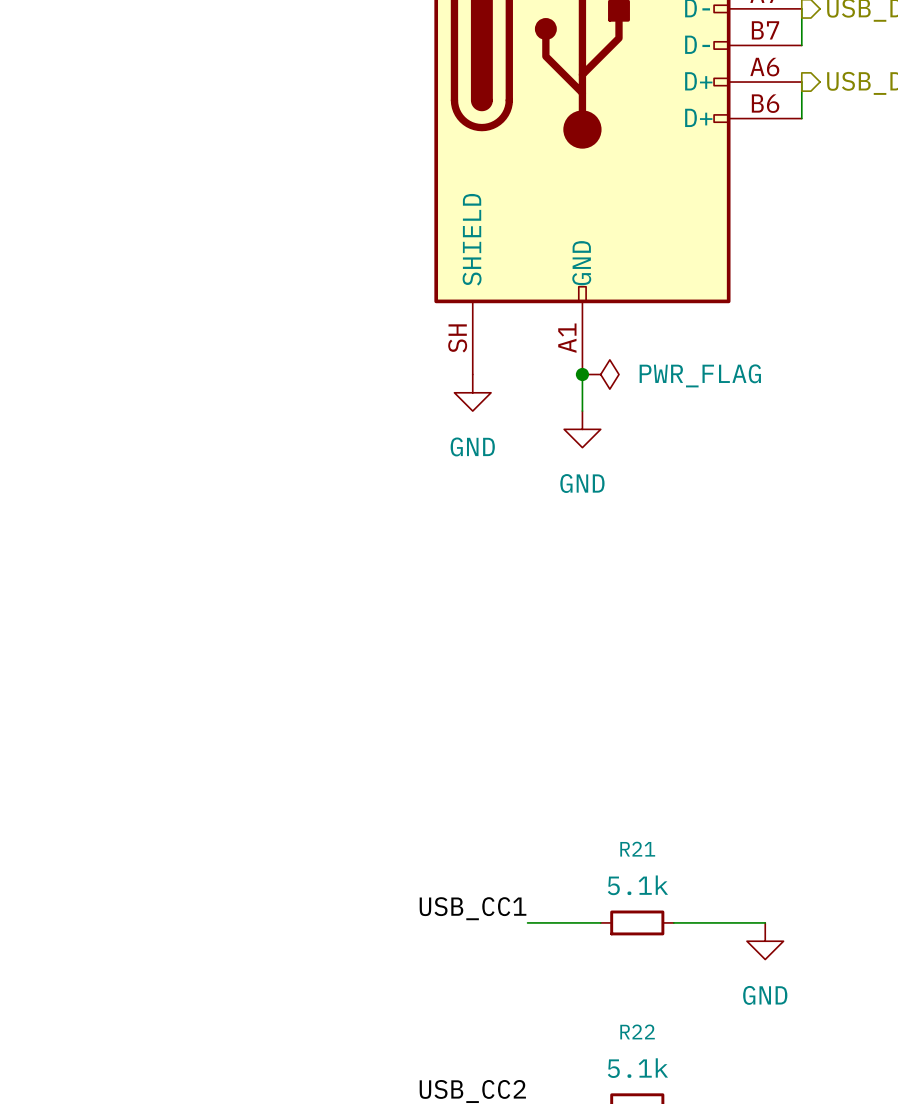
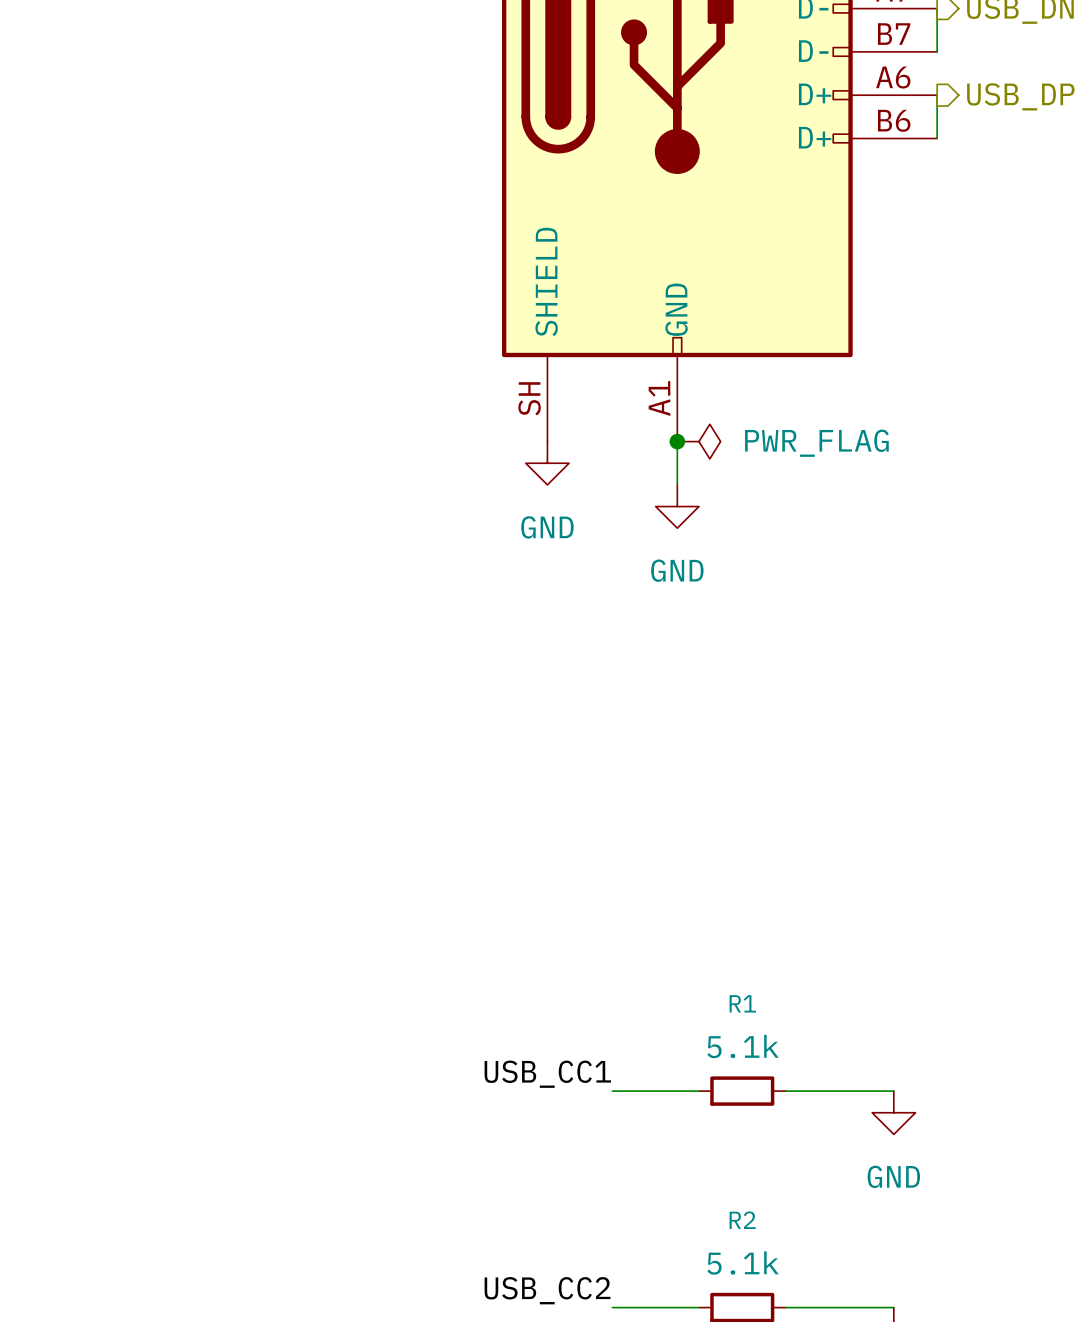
R21 name: R21 (637, 849) -> R1 (742, 1003)
R22 name: R22 (637, 1031) -> R2 (742, 1220)

